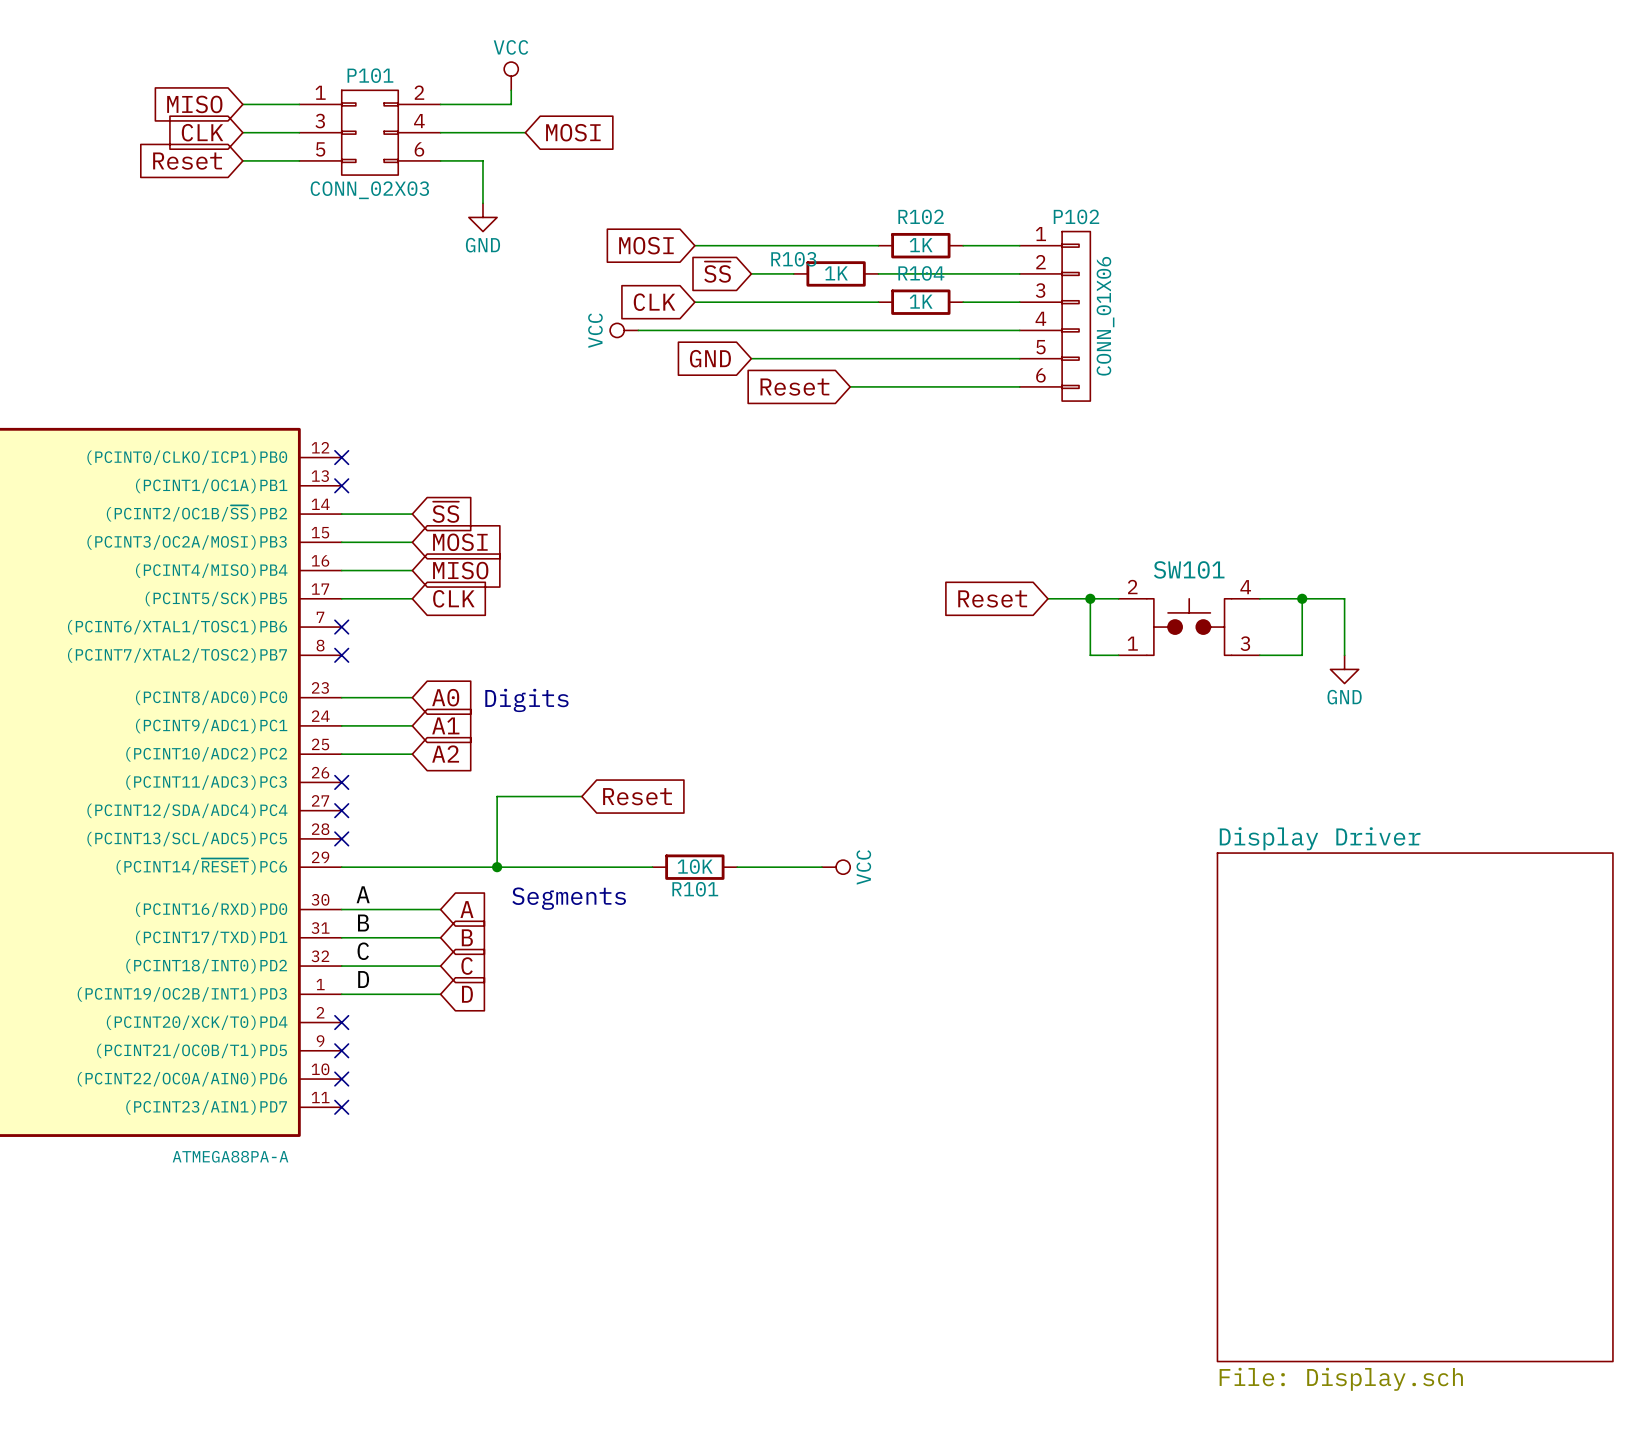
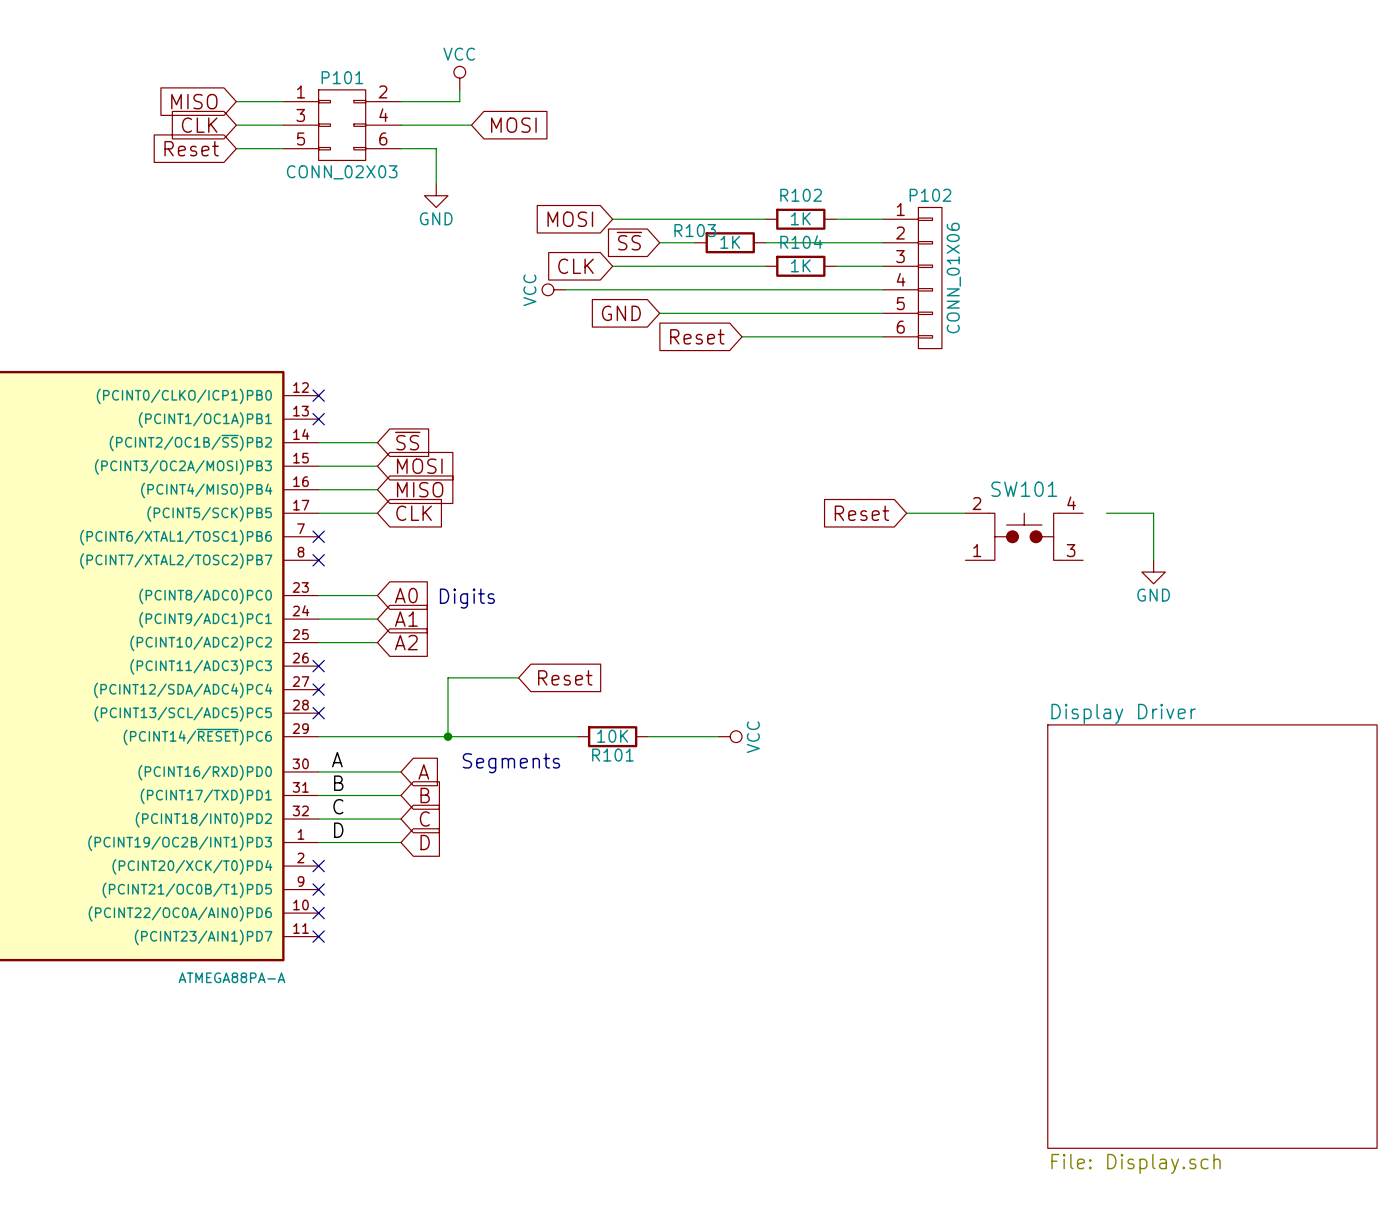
wire: (1090, 598) (1090, 655) (1118, 655) -> none
junction: (1090, 598) -> none
wire: (1259, 598) (1288, 598) -> none
wire: (1302, 598) (1302, 655) (1259, 655) -> none
junction: (1302, 598) -> none

